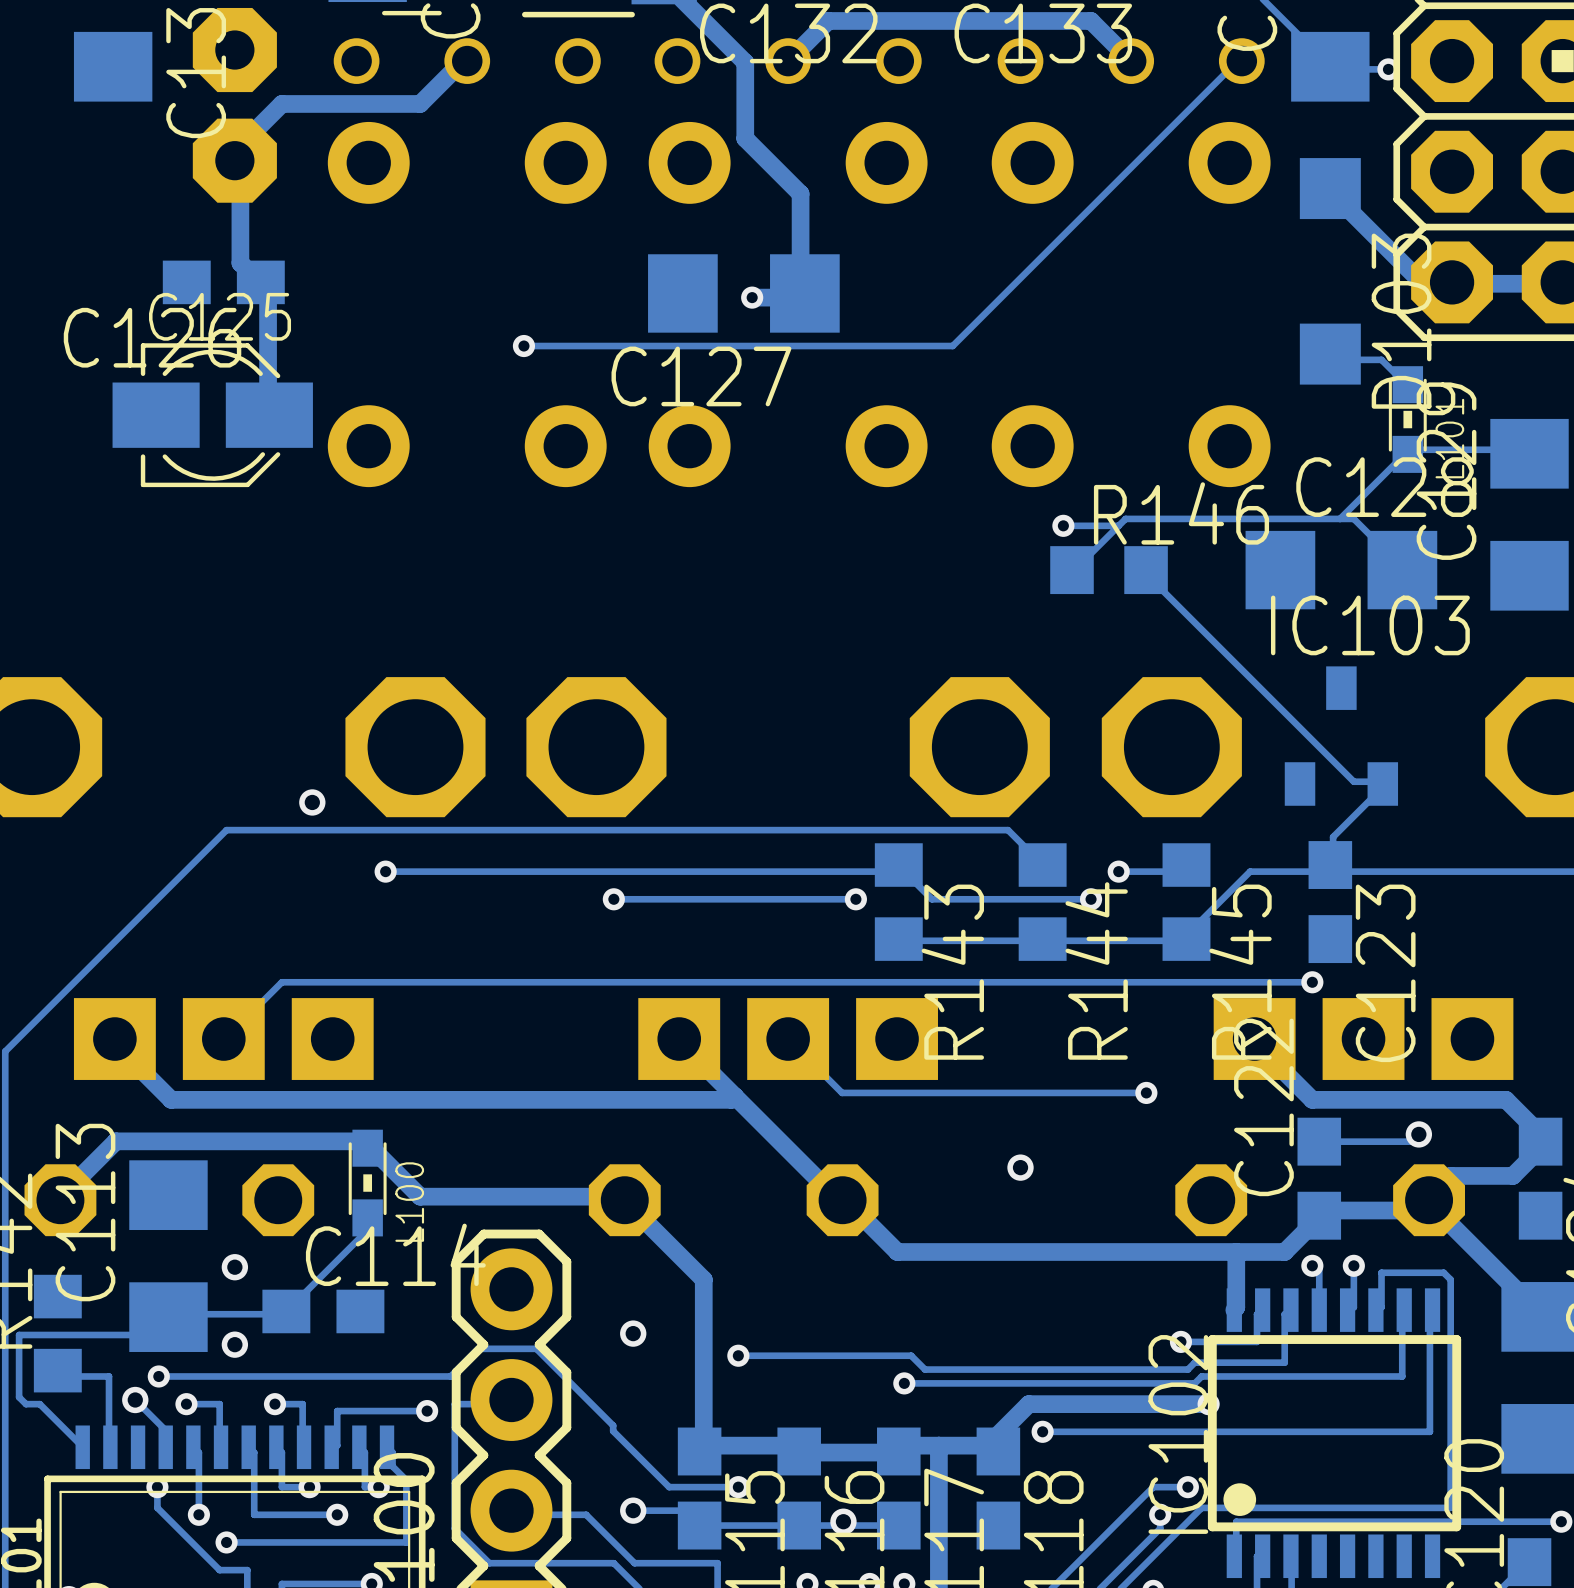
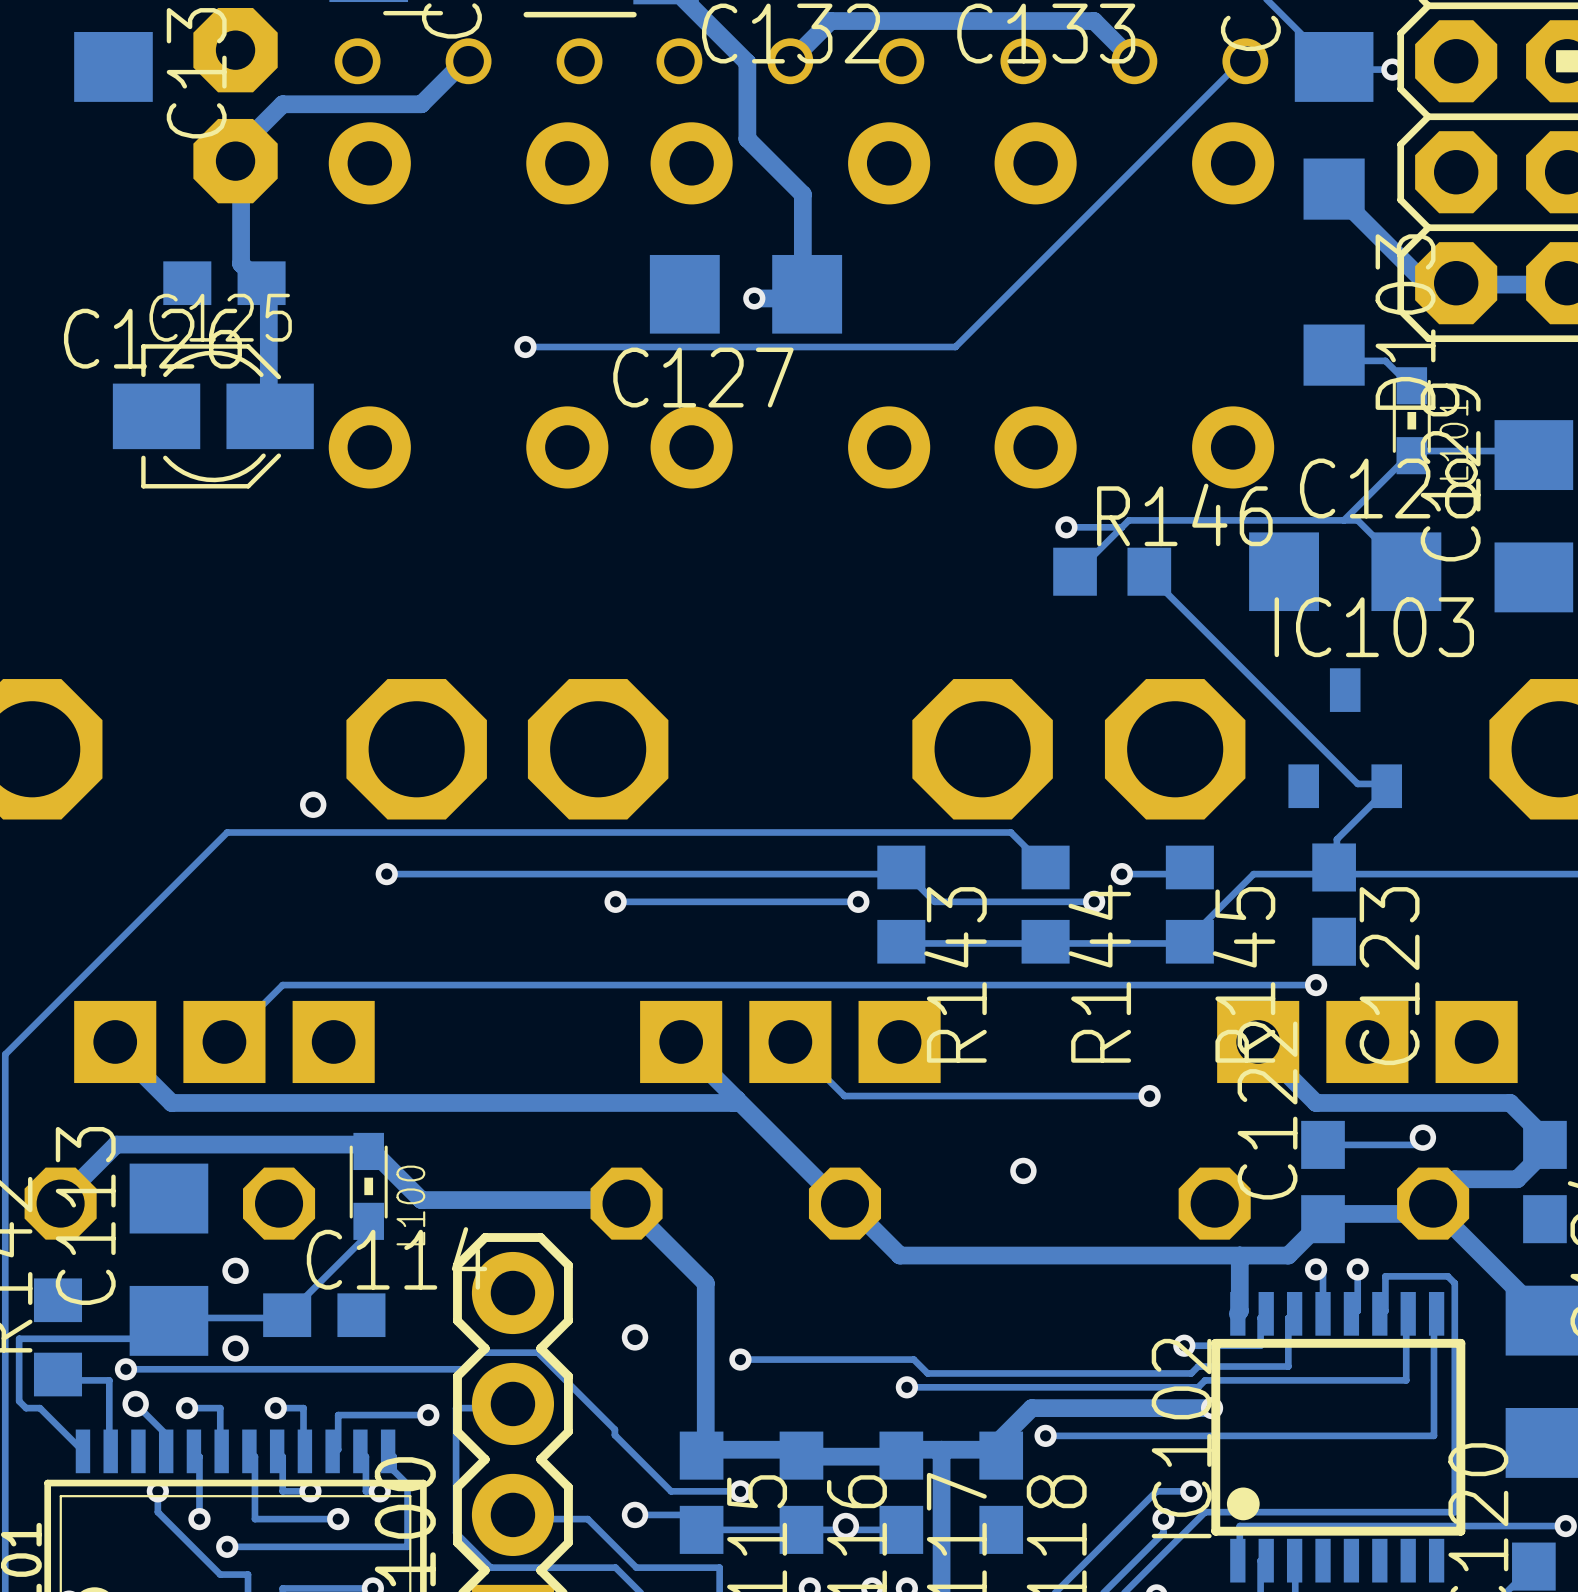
track: (461, 1365) (450, 1376) (158, 1376) -> (463, 1369) (125, 1369)
via position: (158, 1376) -> (125, 1369)

